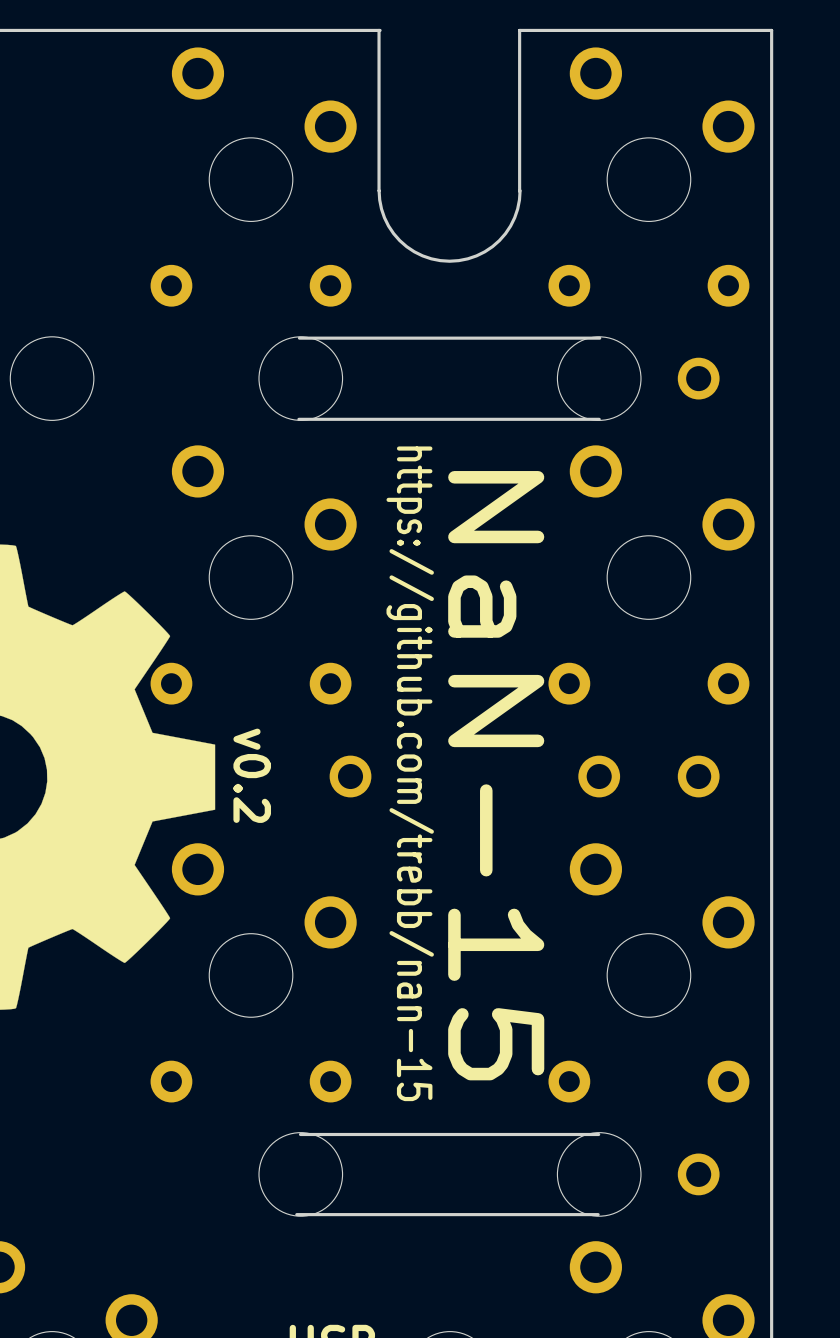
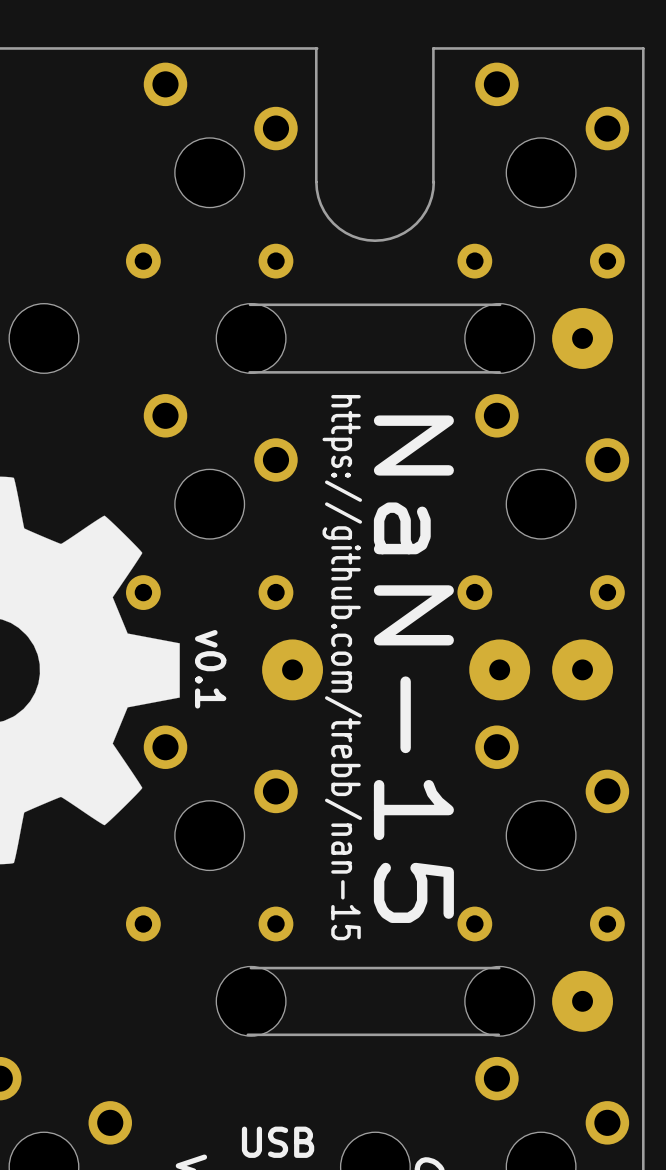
part footprint: [677, 357, 720, 400] -> [552, 308, 613, 369]
part footprint: [329, 755, 372, 798] -> [262, 639, 323, 701]
part footprint: [578, 755, 621, 798] -> [469, 639, 531, 701]
part footprint: [677, 755, 720, 798] -> [552, 639, 613, 701]
text: v0.2 (252, 775) -> v0.1 (210, 669)
part footprint: [677, 1153, 720, 1196] -> [552, 970, 613, 1032]

